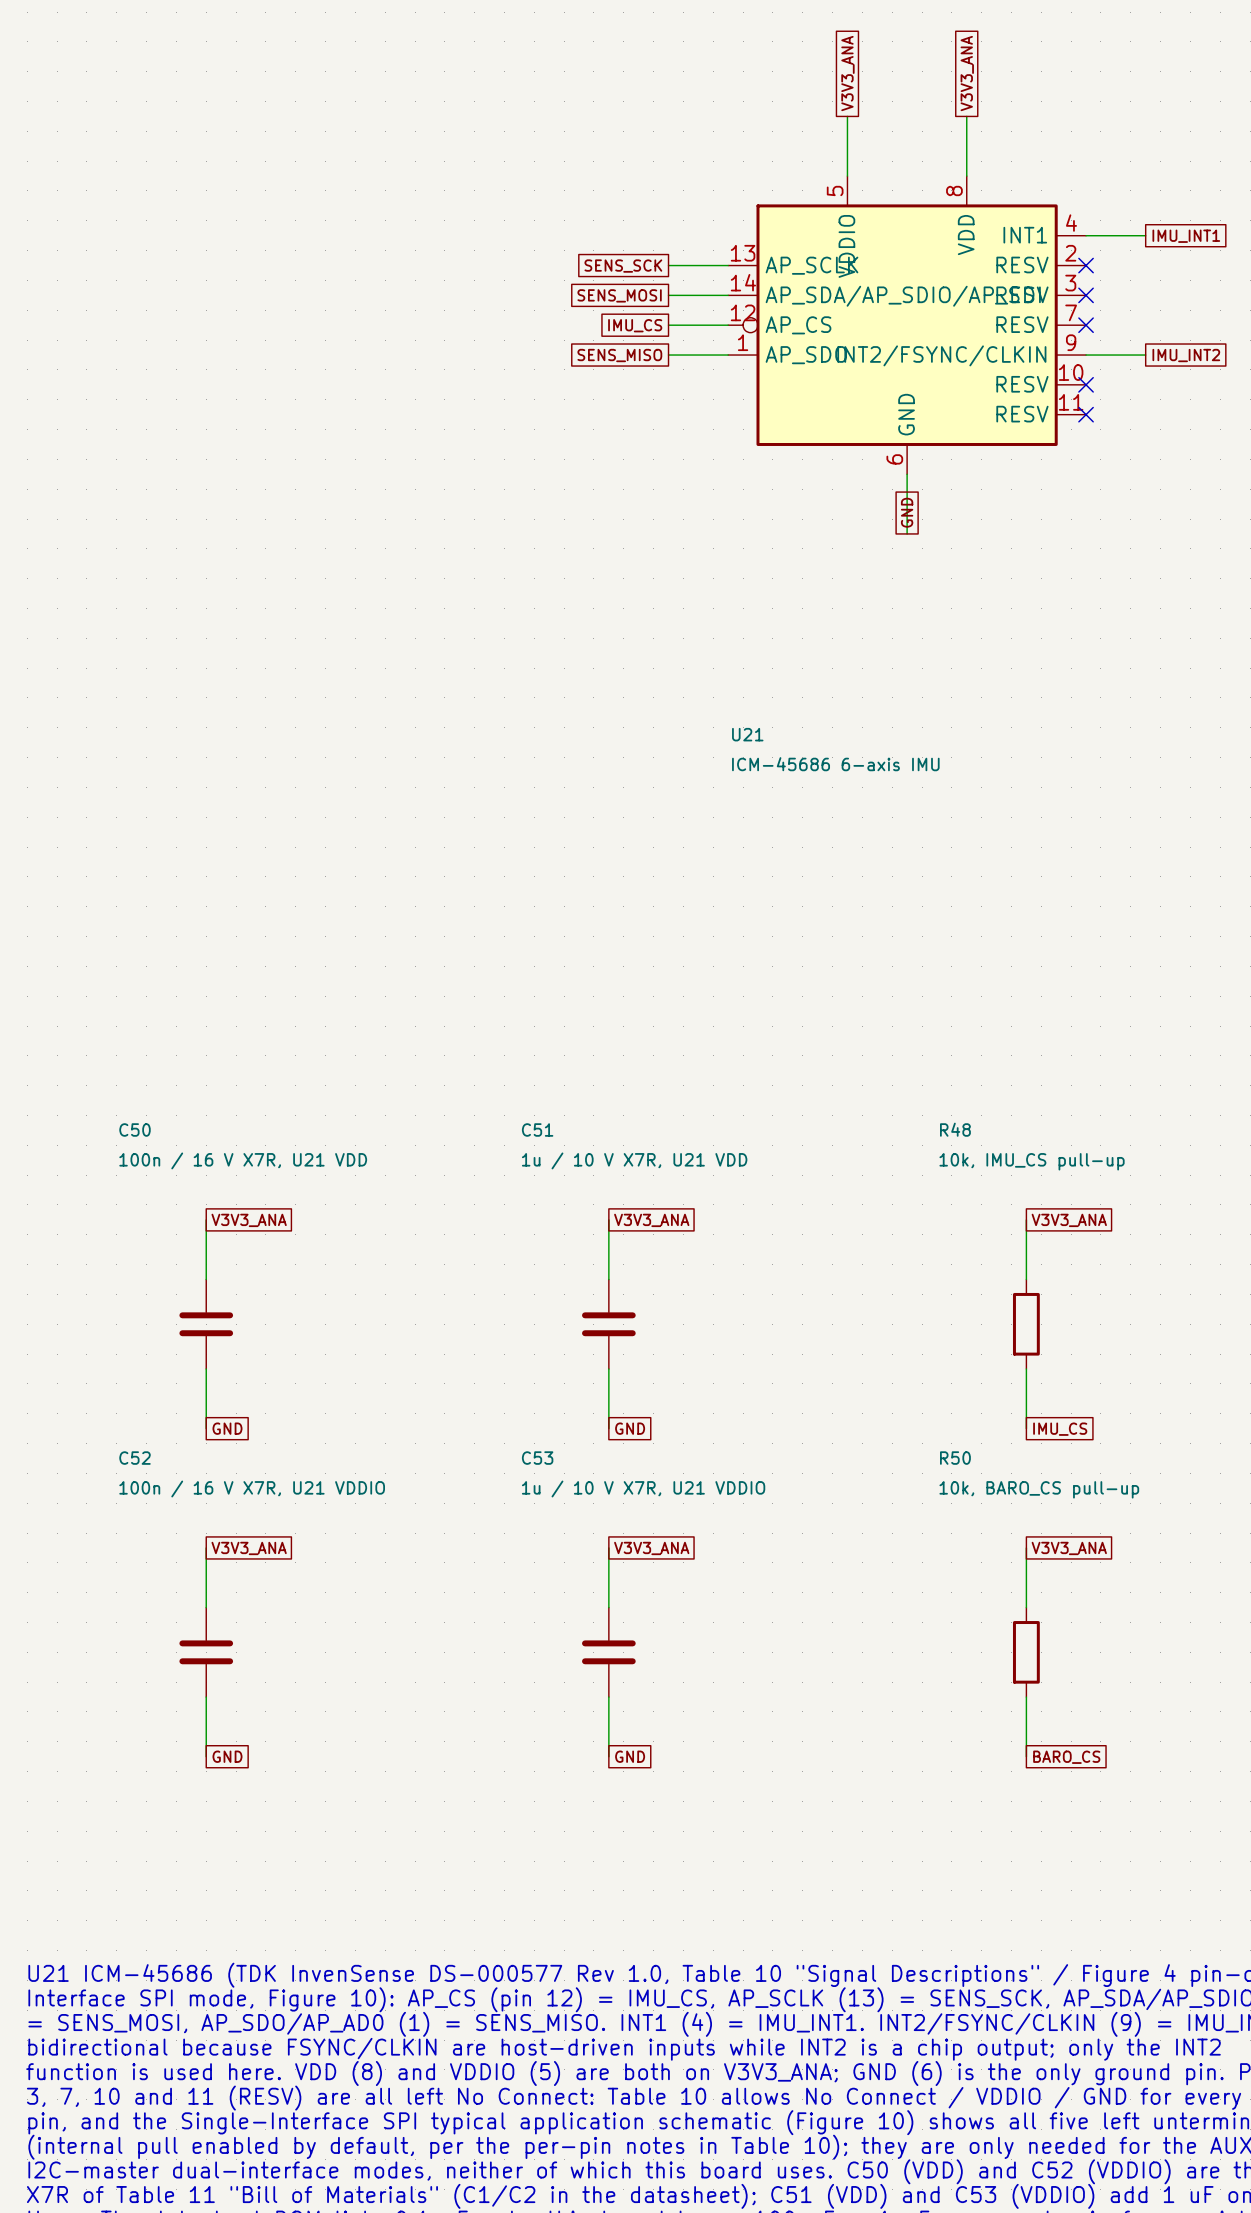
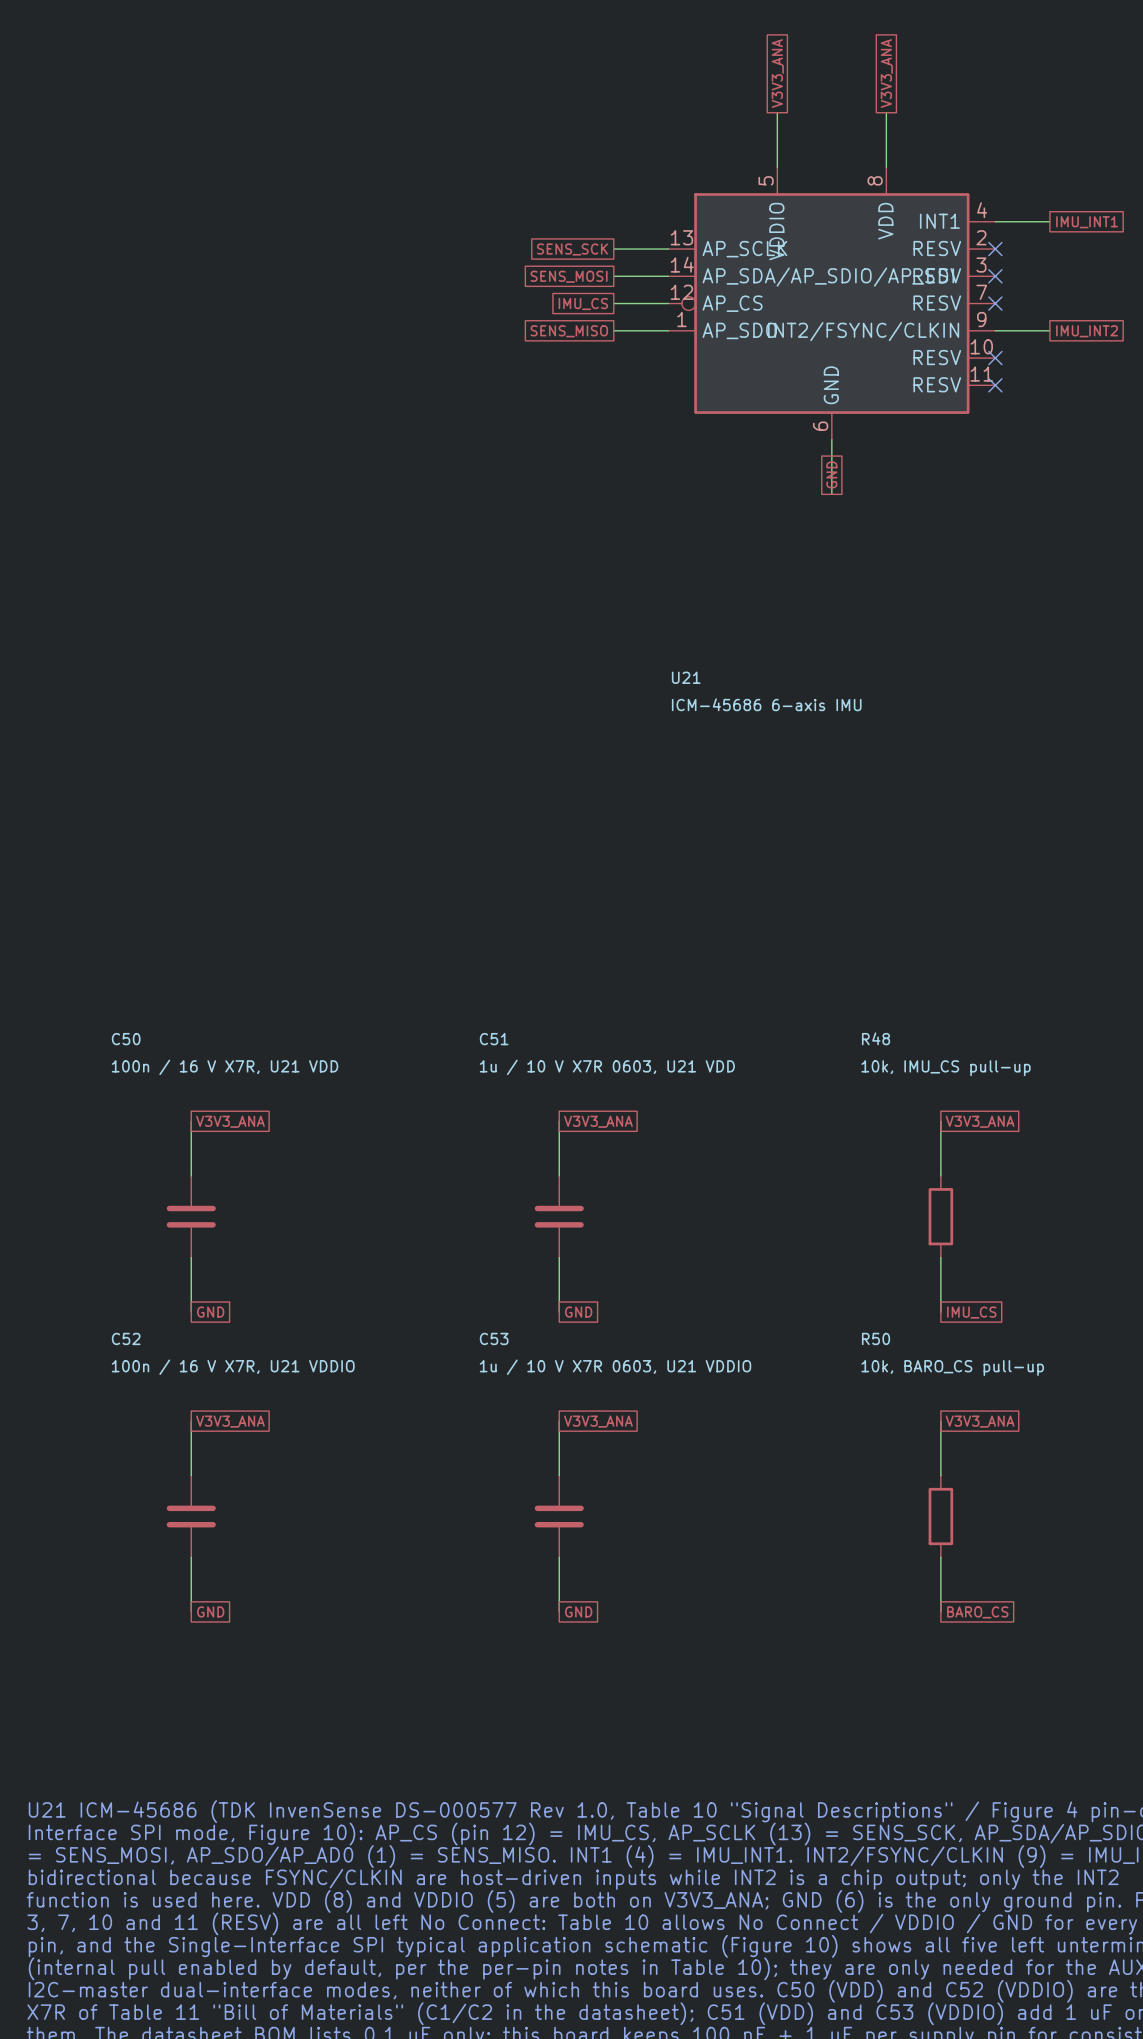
C51 value: 1u / 10 V X7R, U21 VDD (634, 1160) -> 1u / 10 V X7R 0603, U21 VDD (607, 1067)
C53 value: 1u / 10 V X7R, U21 VDDIO (643, 1488) -> 1u / 10 V X7R 0603, U21 VDDIO (615, 1367)

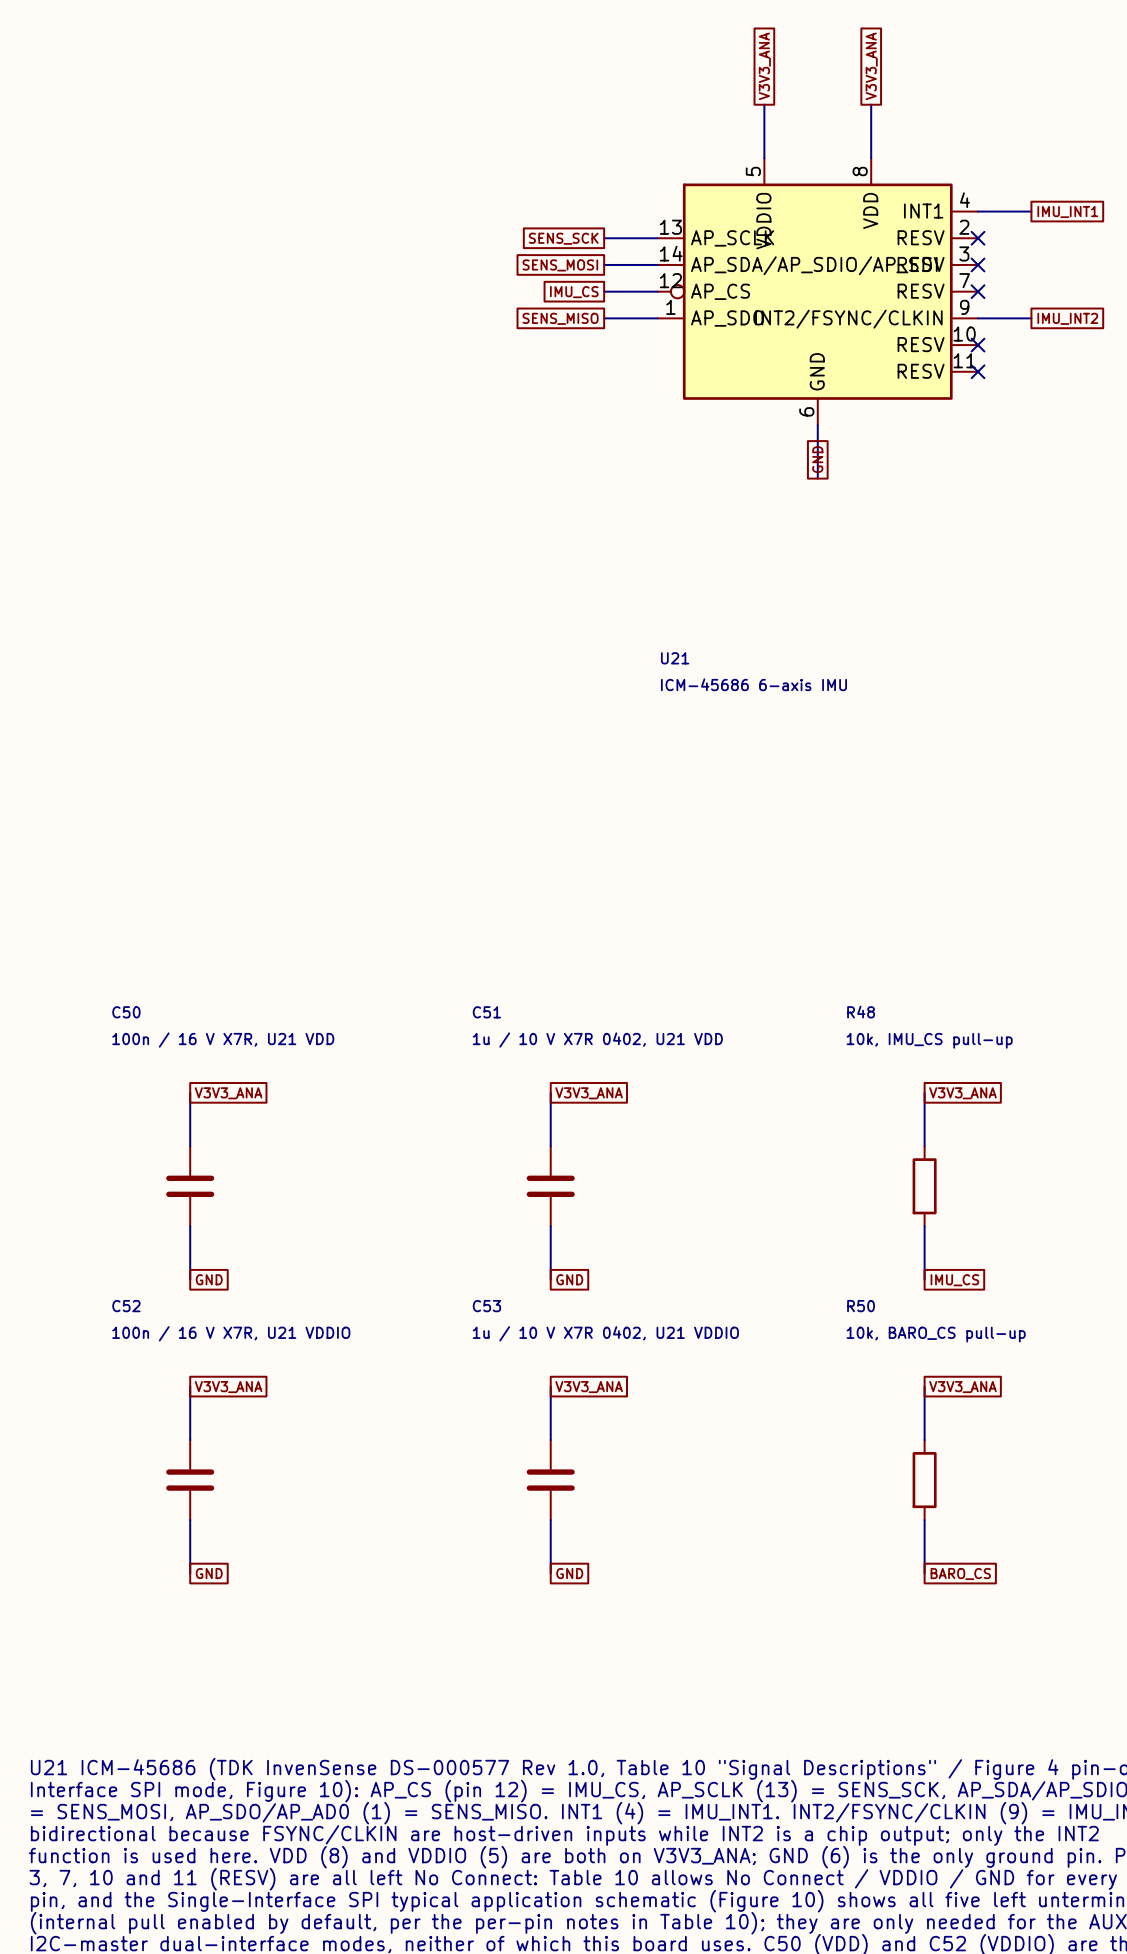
C51 value: 1u / 10 V X7R 0603, U21 VDD (607, 1067) -> 1u / 10 V X7R 0402, U21 VDD (597, 1040)
C53 value: 1u / 10 V X7R 0603, U21 VDDIO (615, 1367) -> 1u / 10 V X7R 0402, U21 VDDIO (605, 1333)

